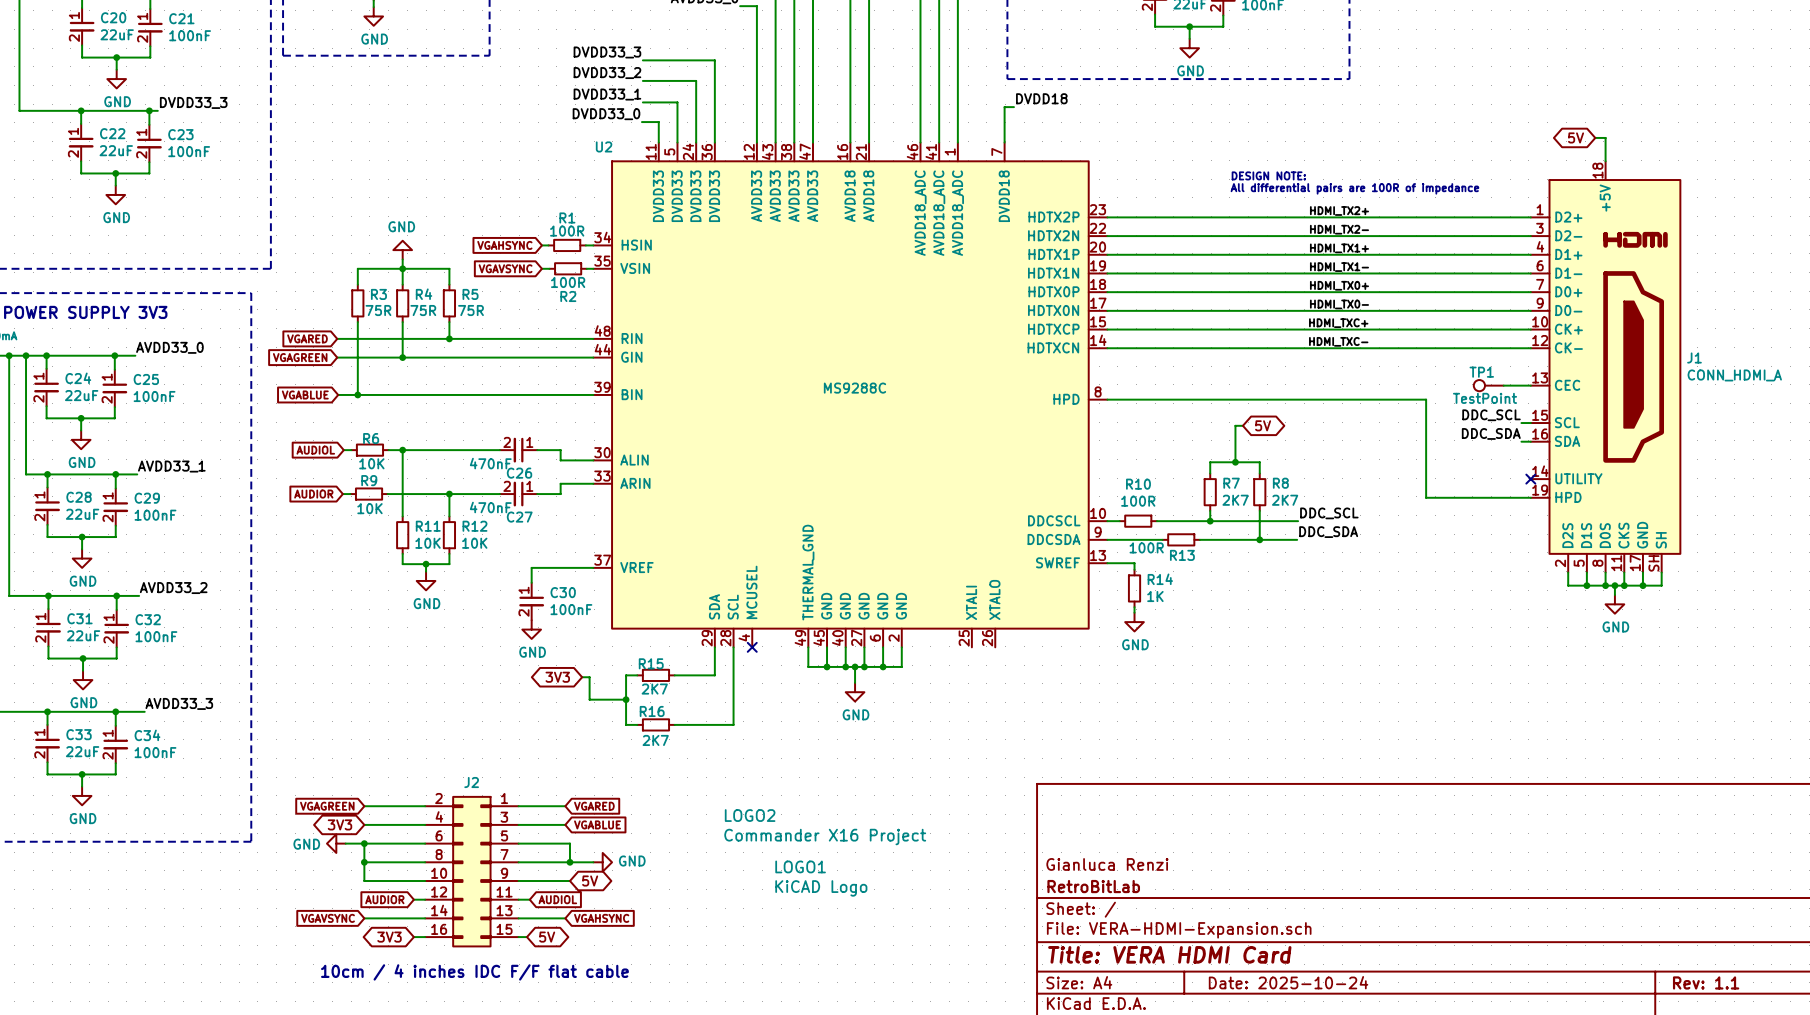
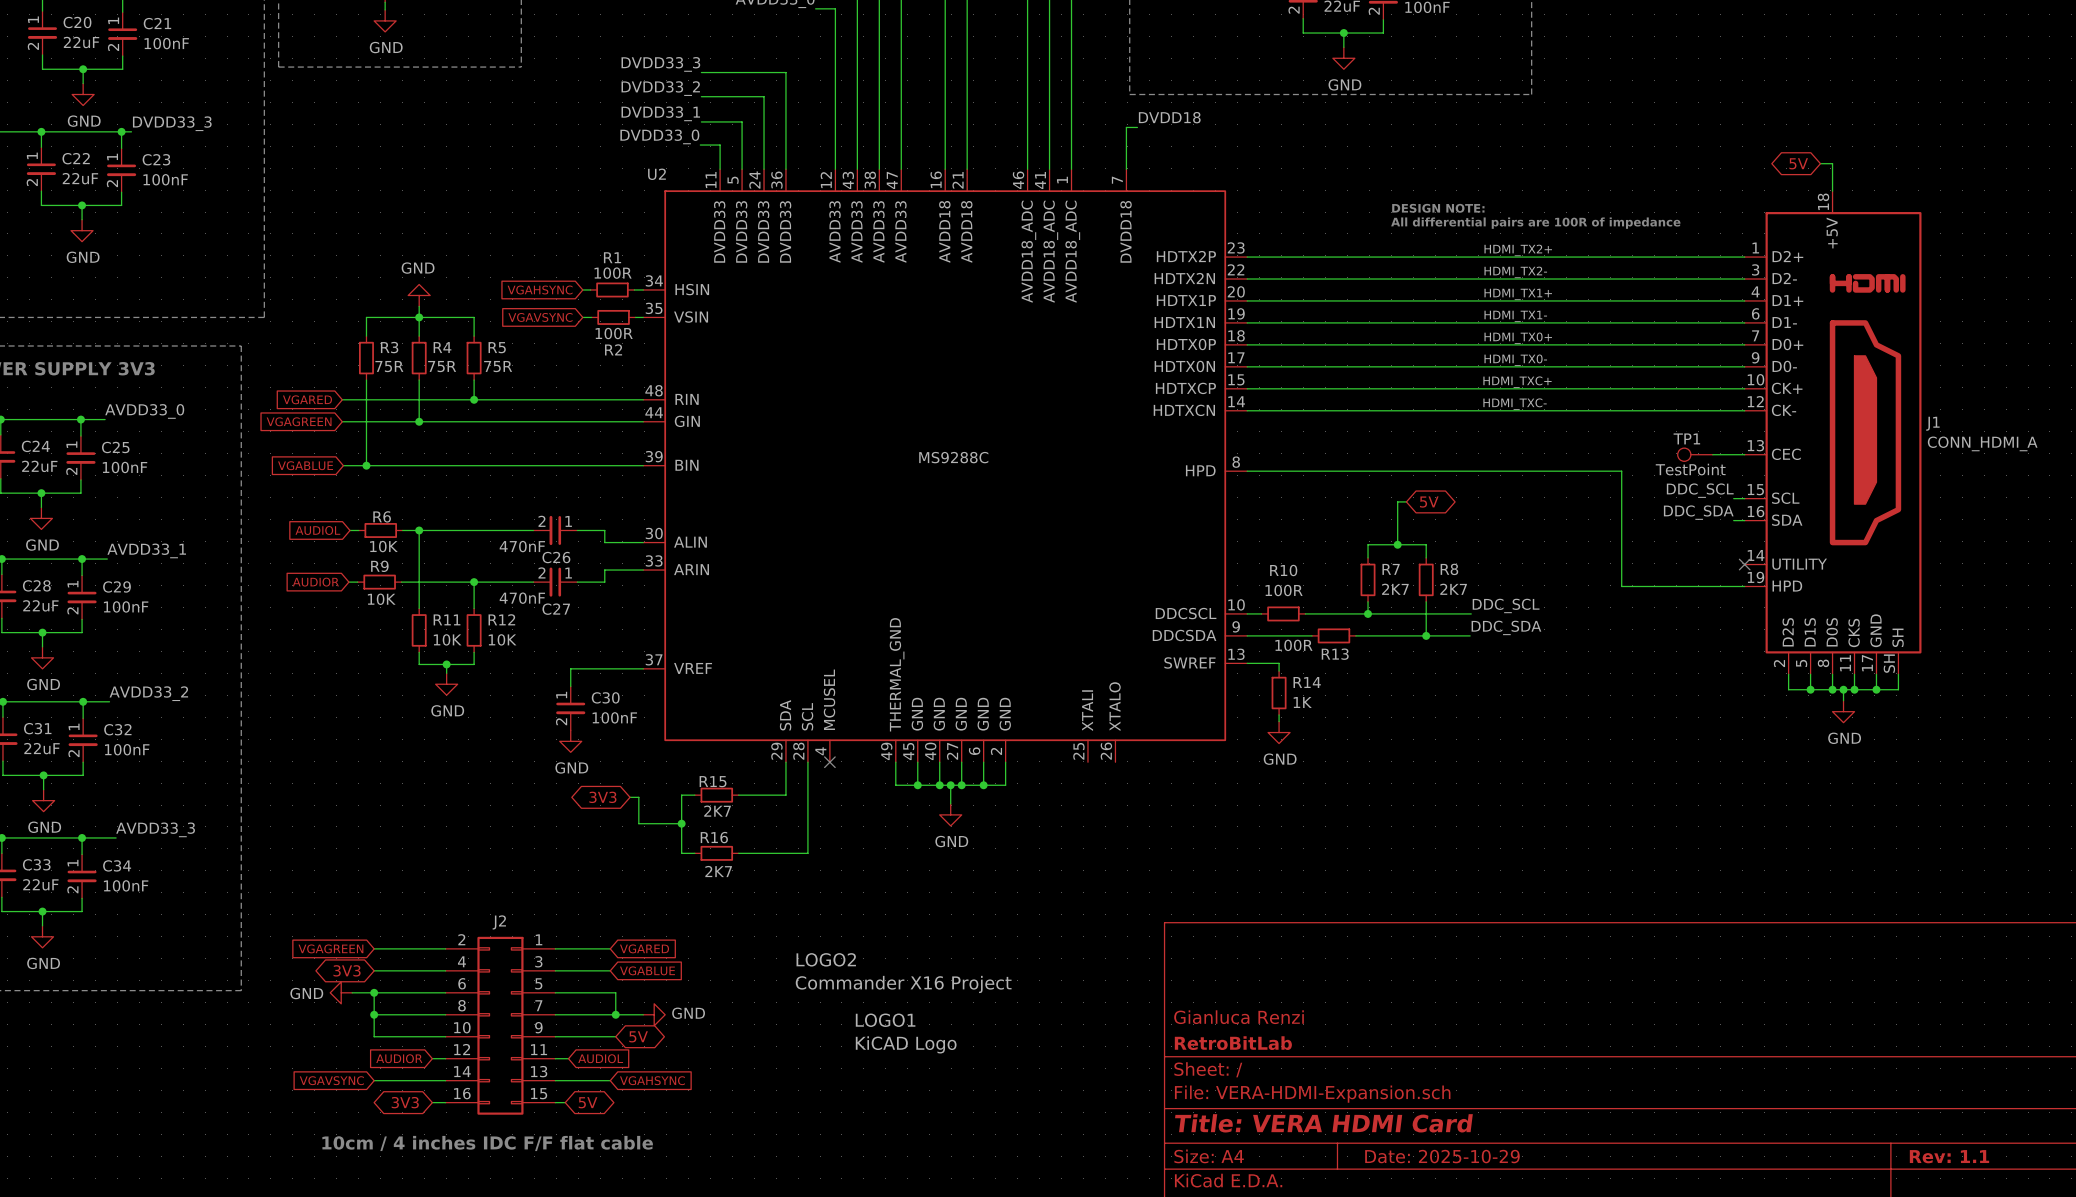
title block: Date: 2025-10-24 (1288, 982) -> Date: 2025-10-29 (1442, 1156)

